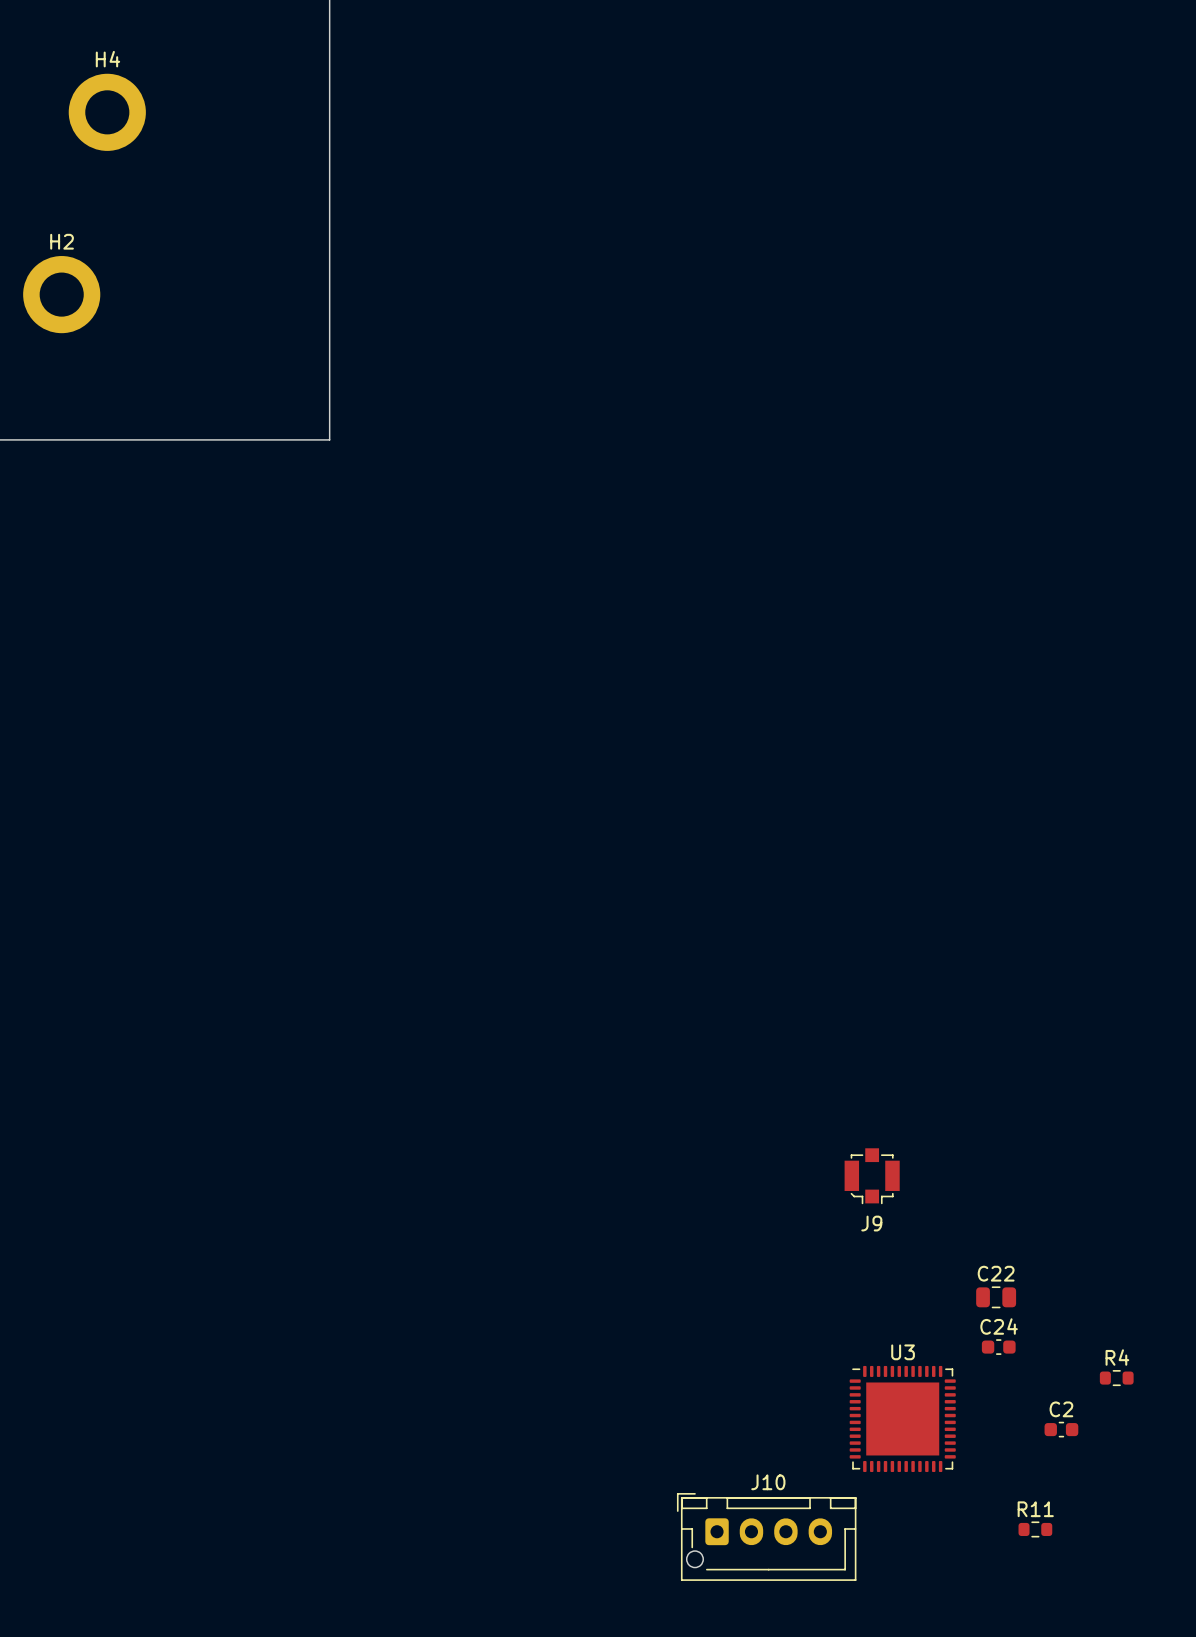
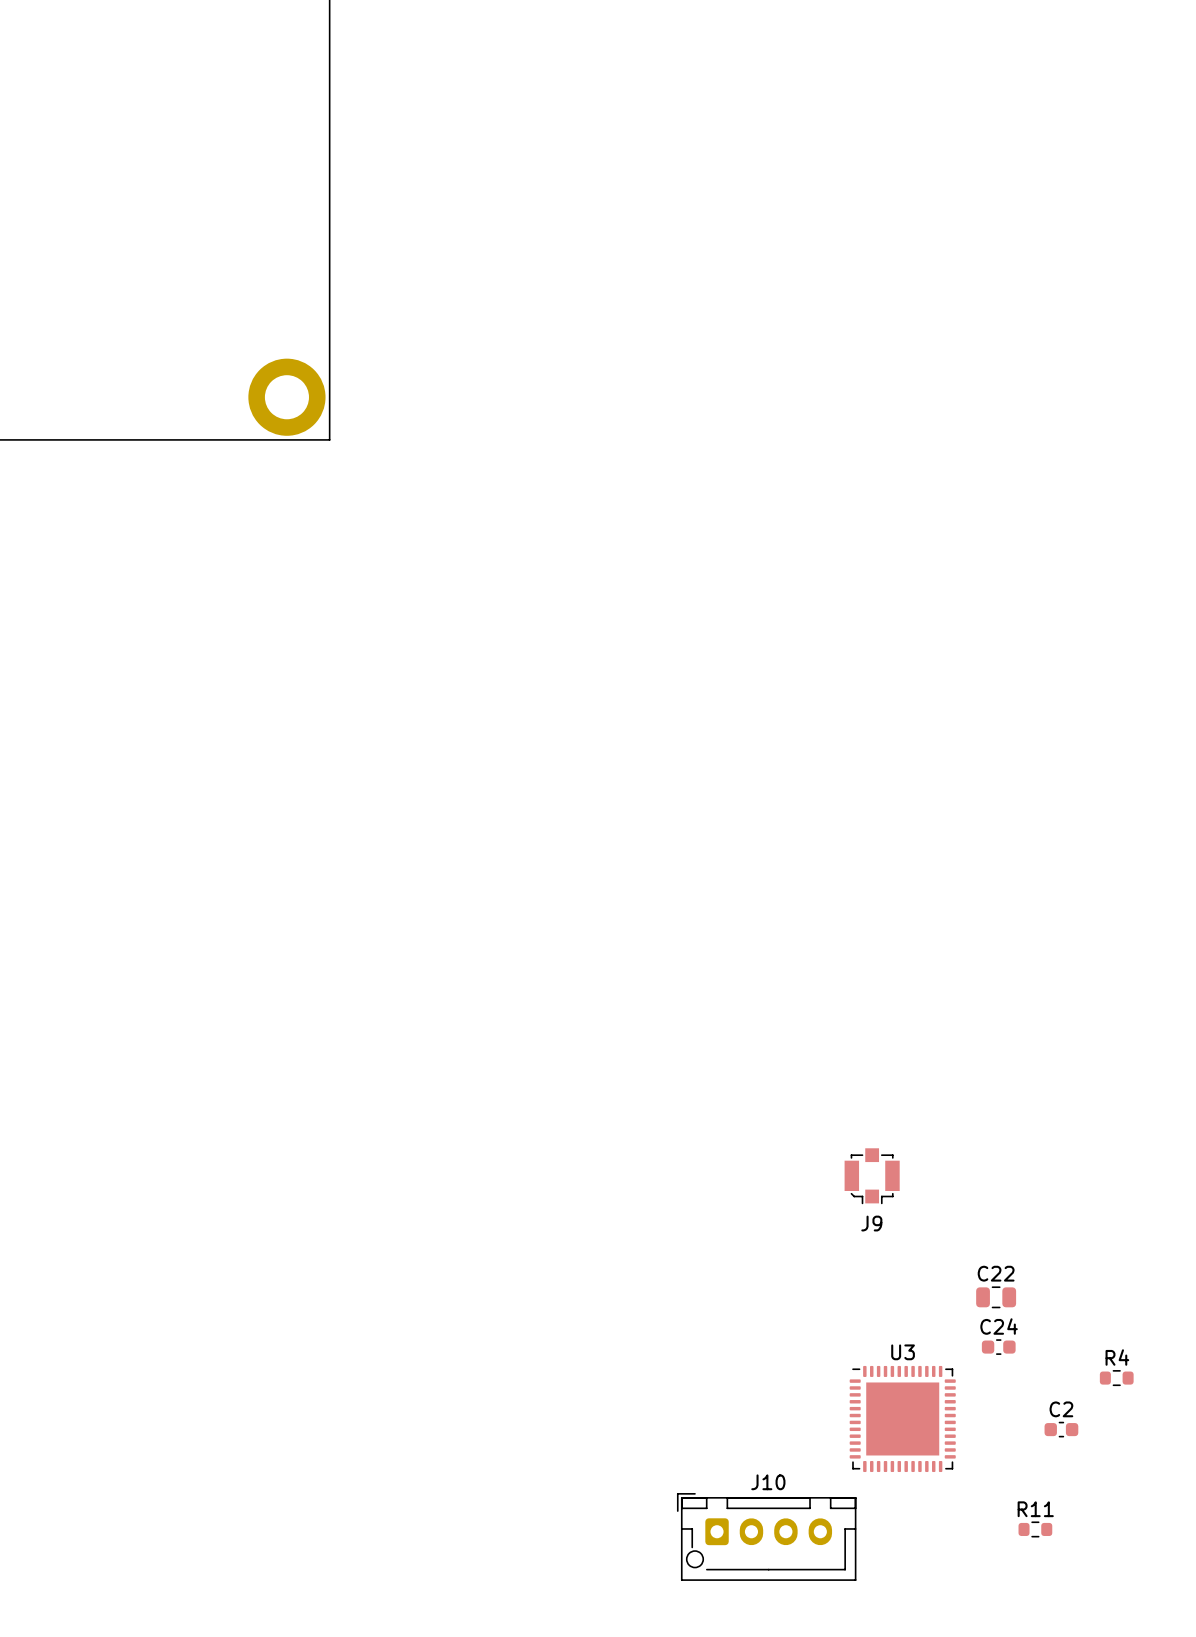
H4: (107, 112) -> none
H2: (61, 294) -> none
part: none -> (286, 397)

